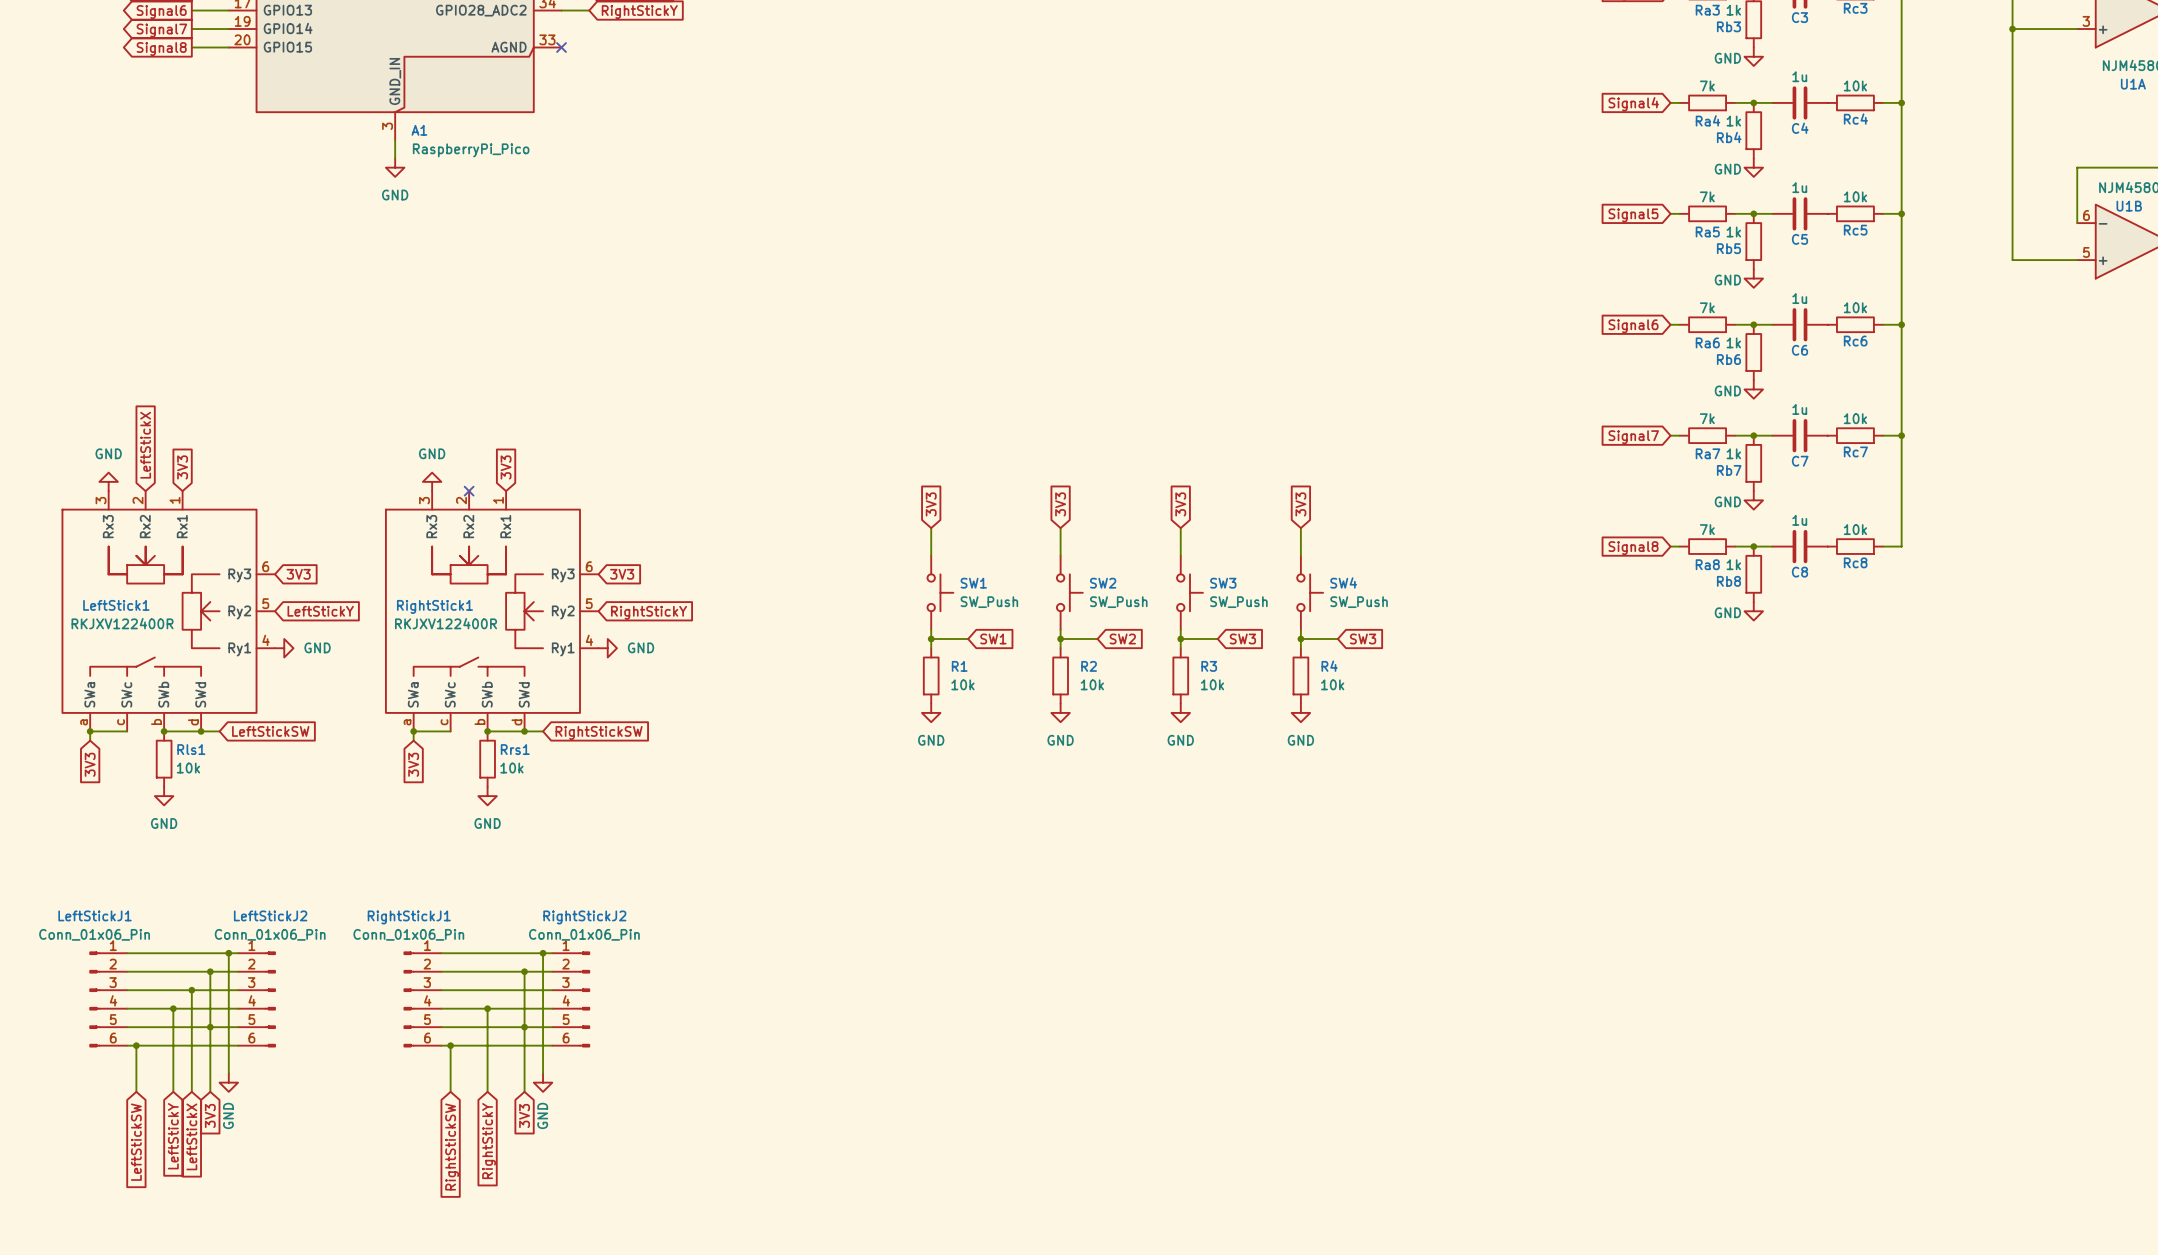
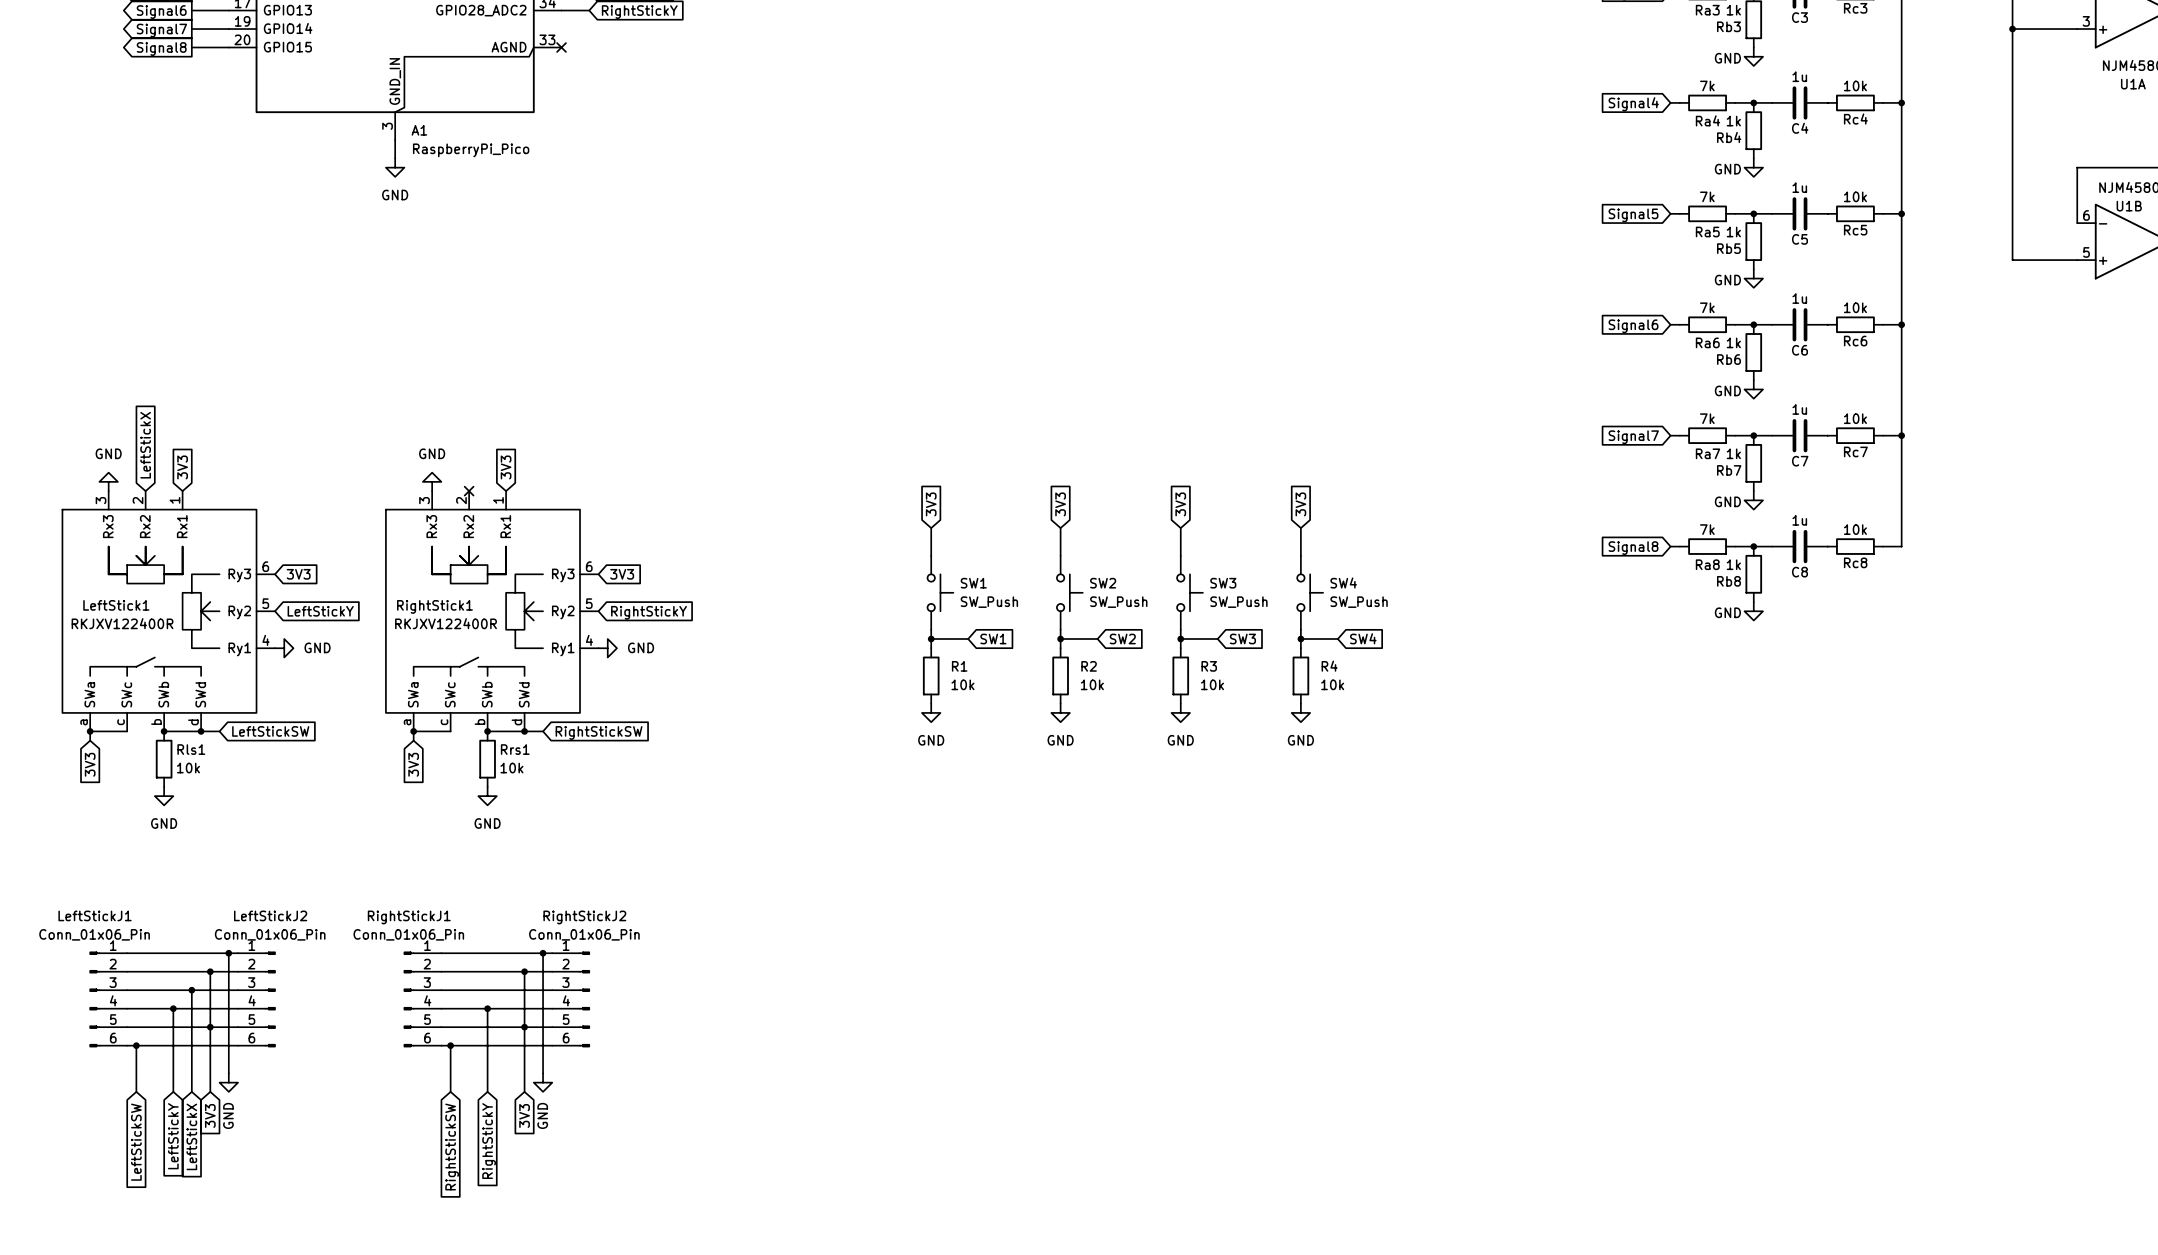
global label: SW3 (1363, 639) -> SW4 (1363, 638)

